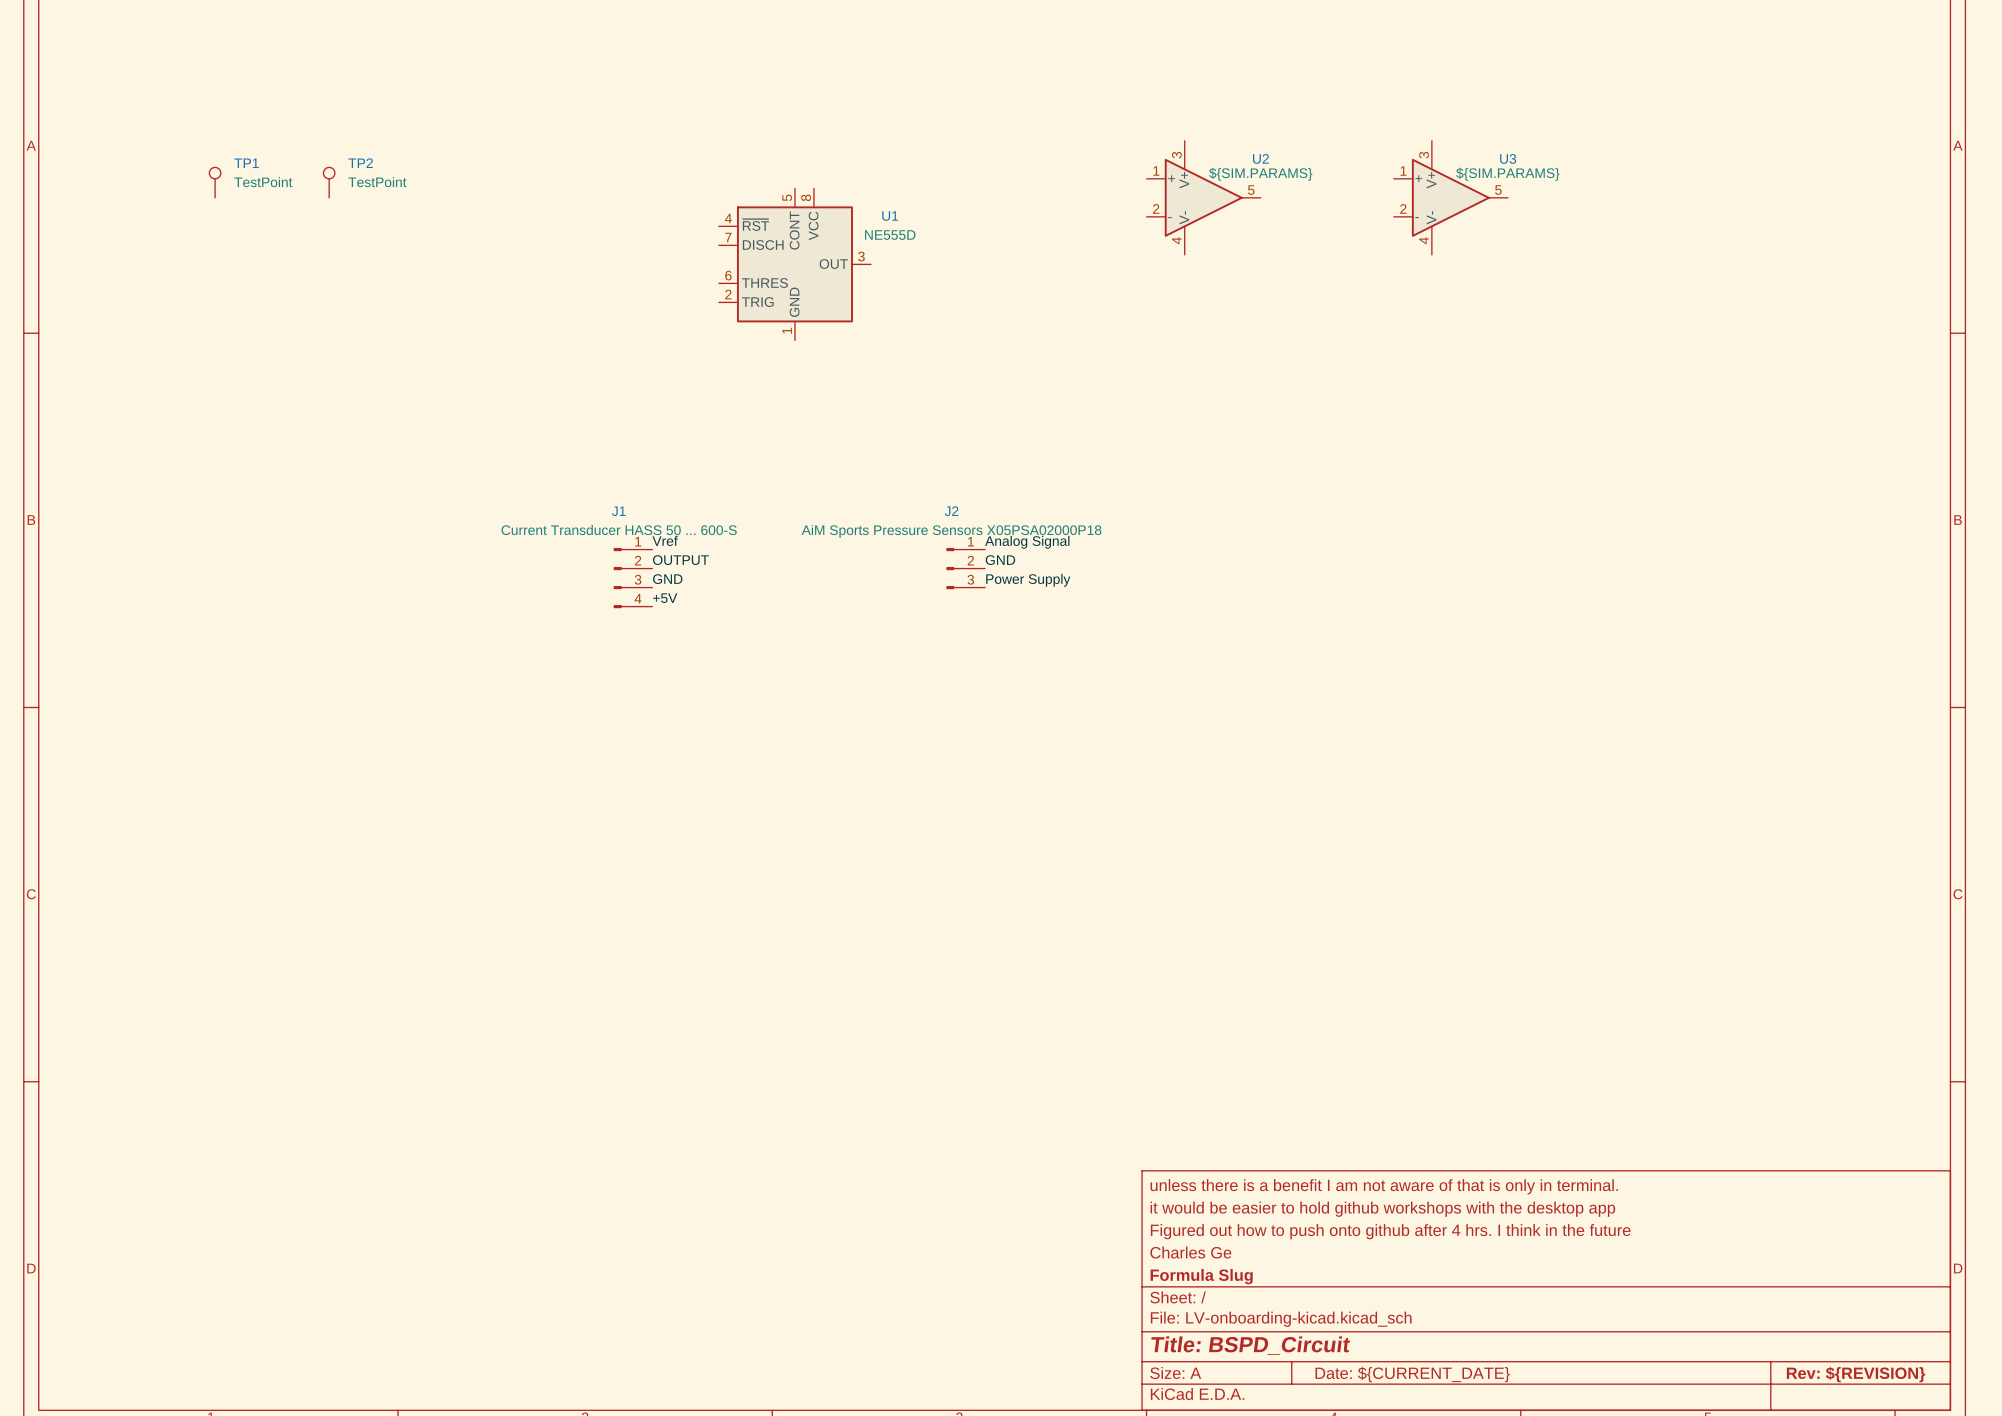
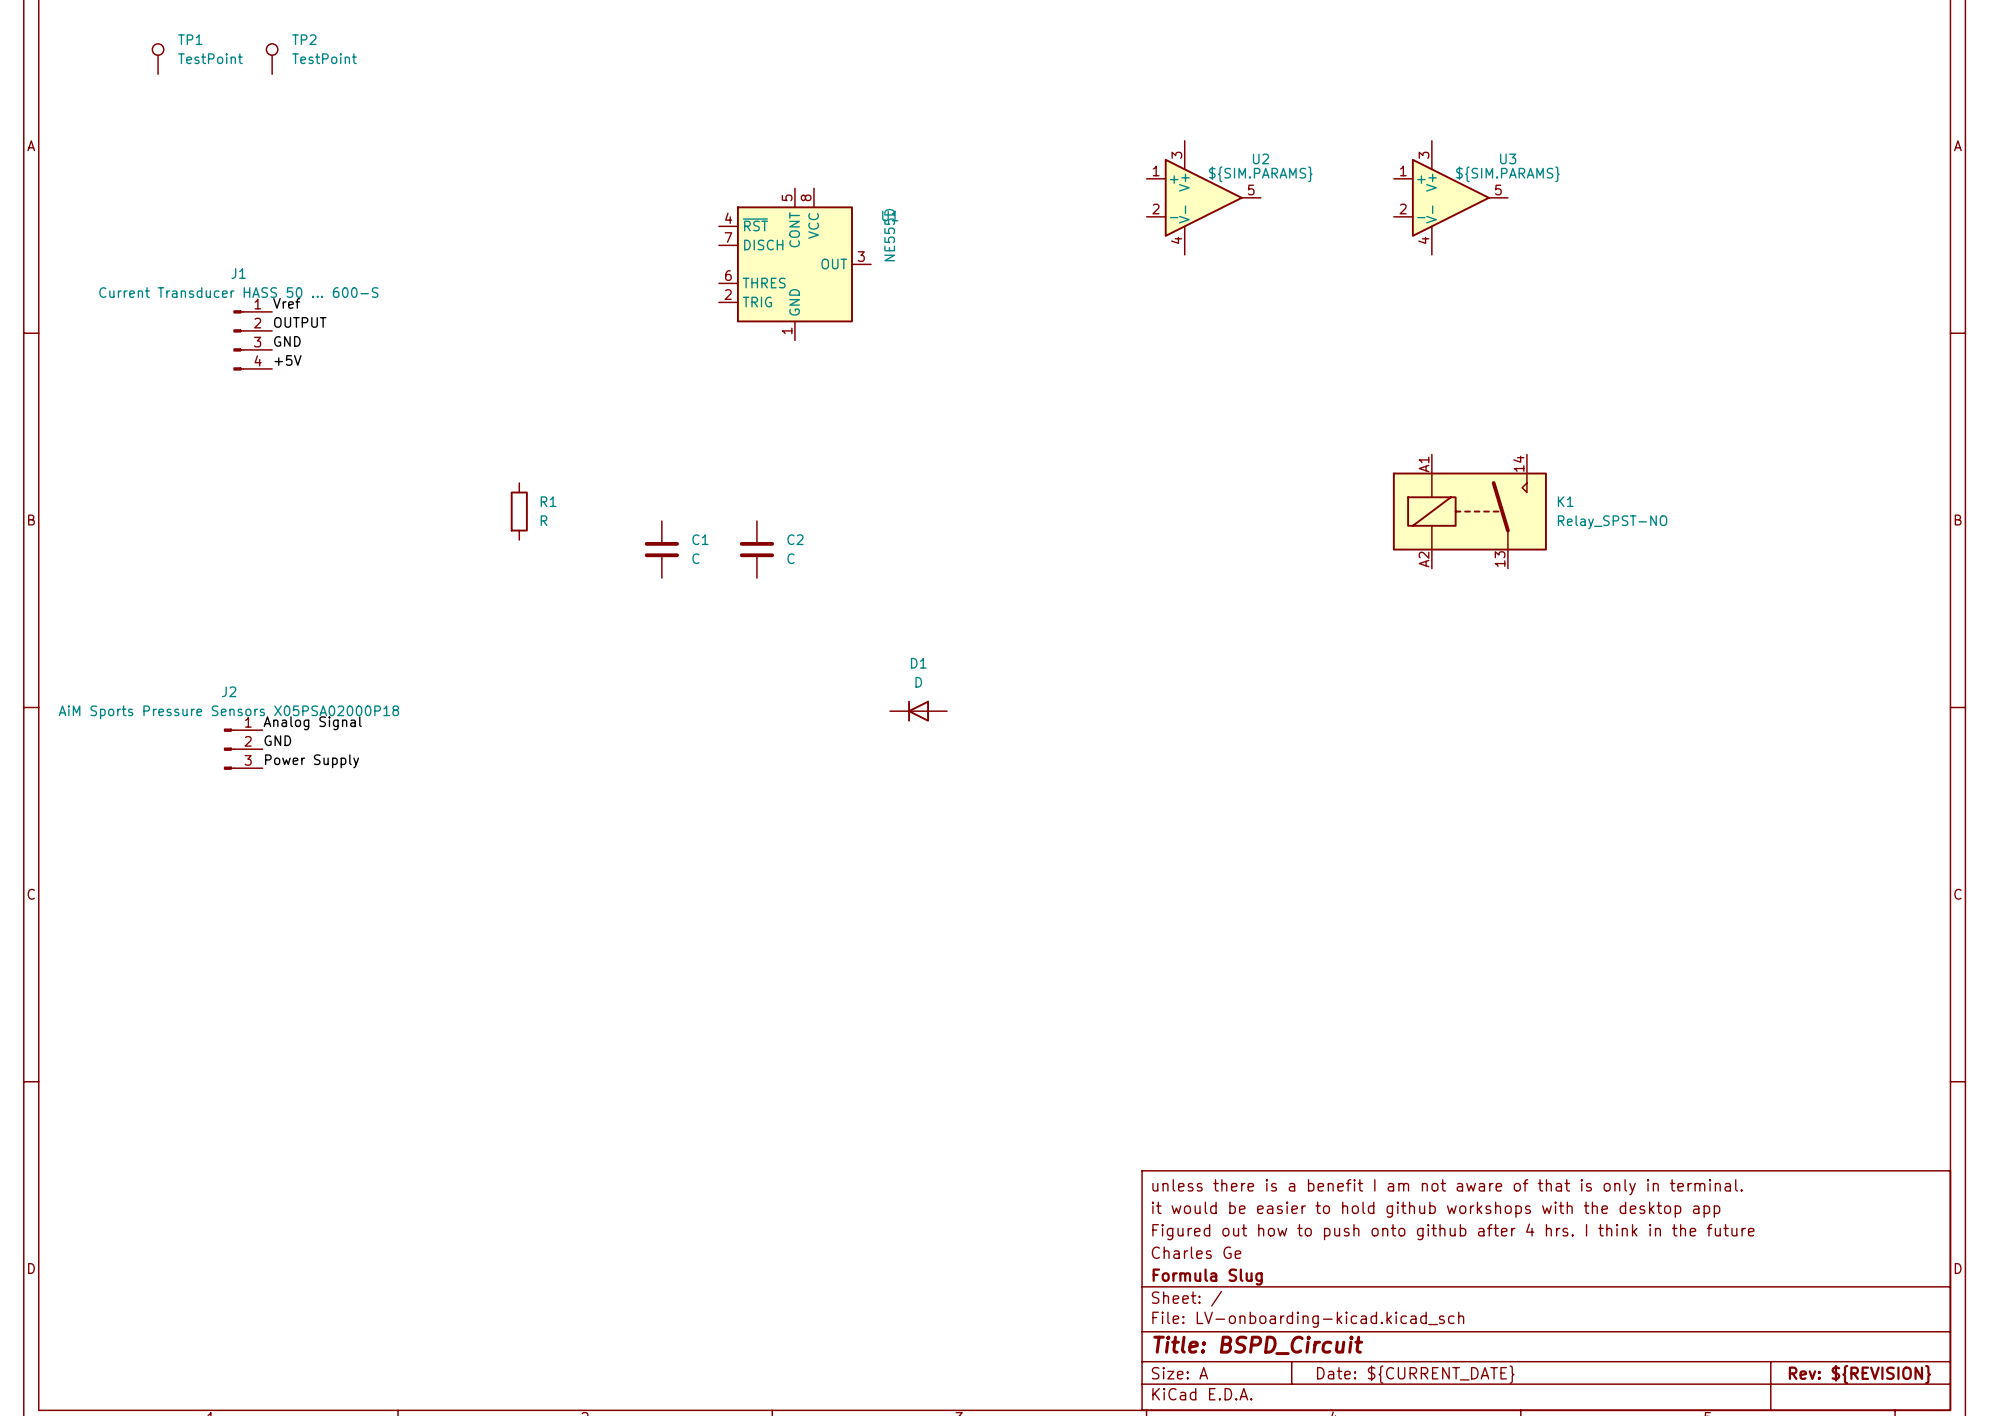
TP1 position: (215, 182) -> (158, 59)
TP2 position: (329, 182) -> (272, 59)
U1 value rotation: 0° (890, 235) -> 90° counterclockwise (889, 235)
label: none -> Vref (286, 303)
label: none -> OUTPUT (300, 322)
label: none -> GND (287, 341)
label: none -> +5V (288, 360)
R1: none -> R (519, 511)
K1: none -> Relay_SPST-NO (1469, 511)
label: Vref (665, 540) -> none
label: Analog Signal (1027, 542) -> none
C1: none -> C (661, 549)
C2: none -> C (756, 549)
label: OUTPUT (680, 560) -> none
label: GND (1000, 560) -> none
J2 position: (965, 568) -> (243, 749)
J1 position: (633, 578) -> (252, 340)
label: GND (667, 579) -> none
label: Power Supply (1028, 580) -> none
label: +5V (665, 598) -> none
D1: none -> D (918, 711)
label: none -> Analog Signal (312, 723)
label: none -> GND (277, 740)
label: none -> Power Supply (312, 761)

